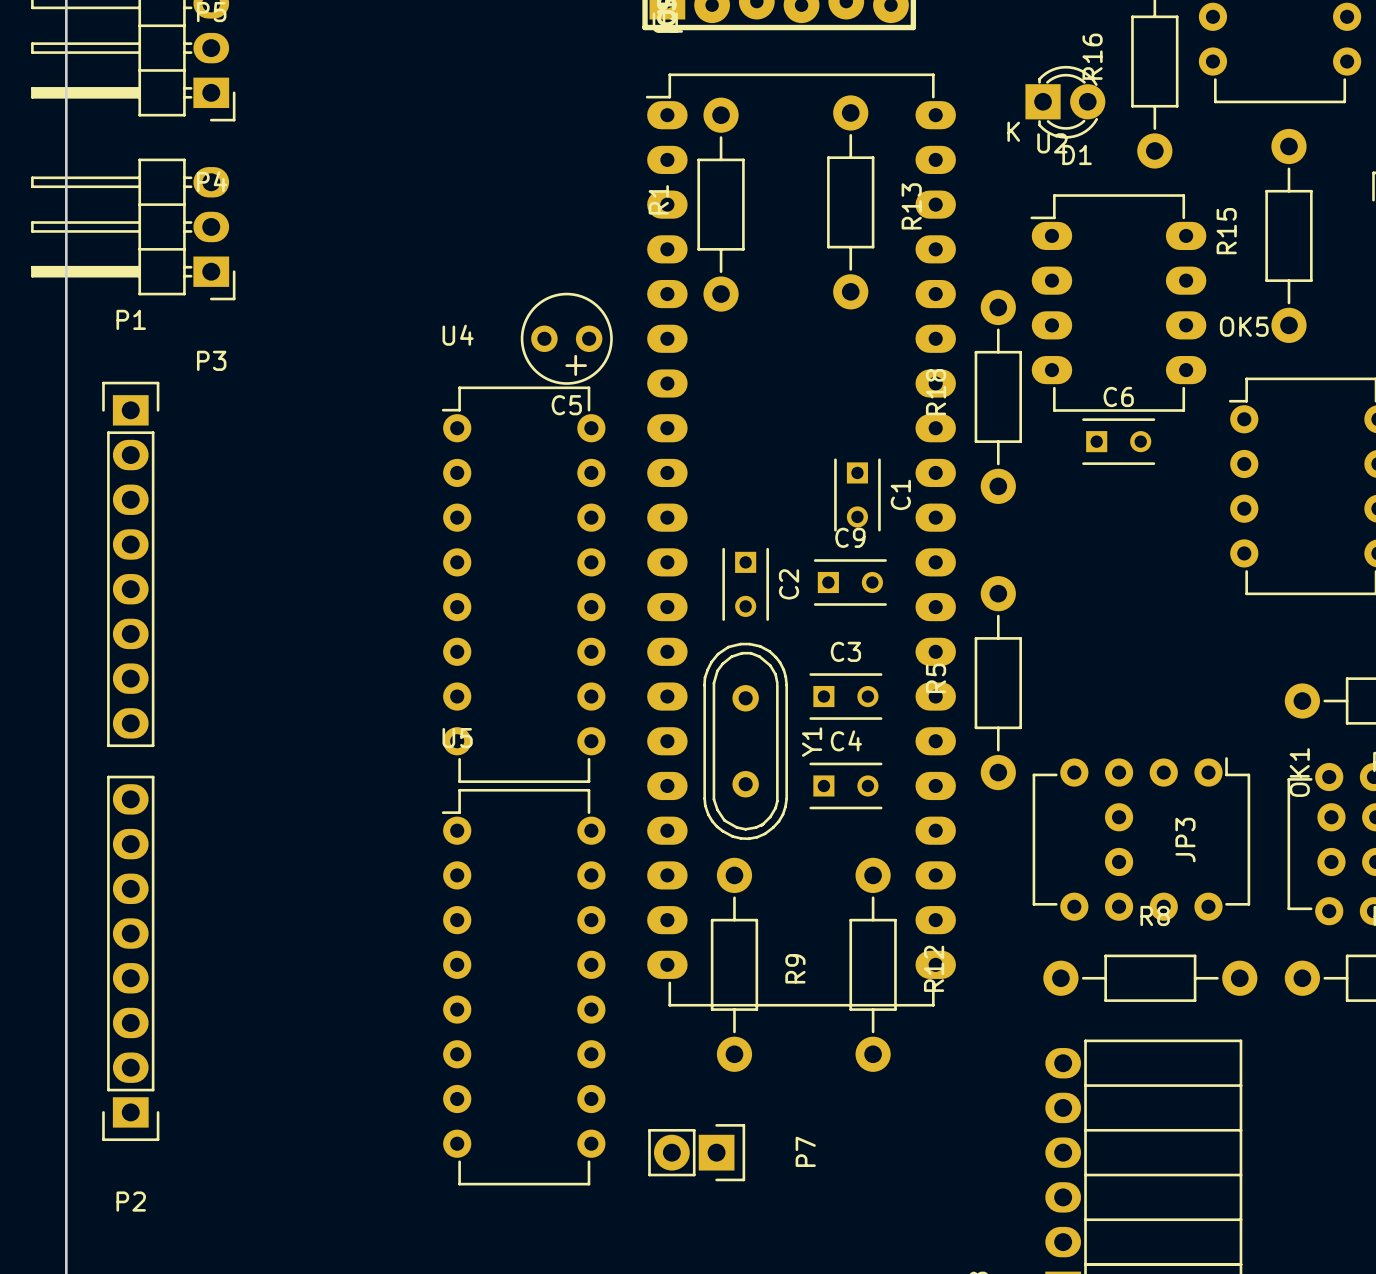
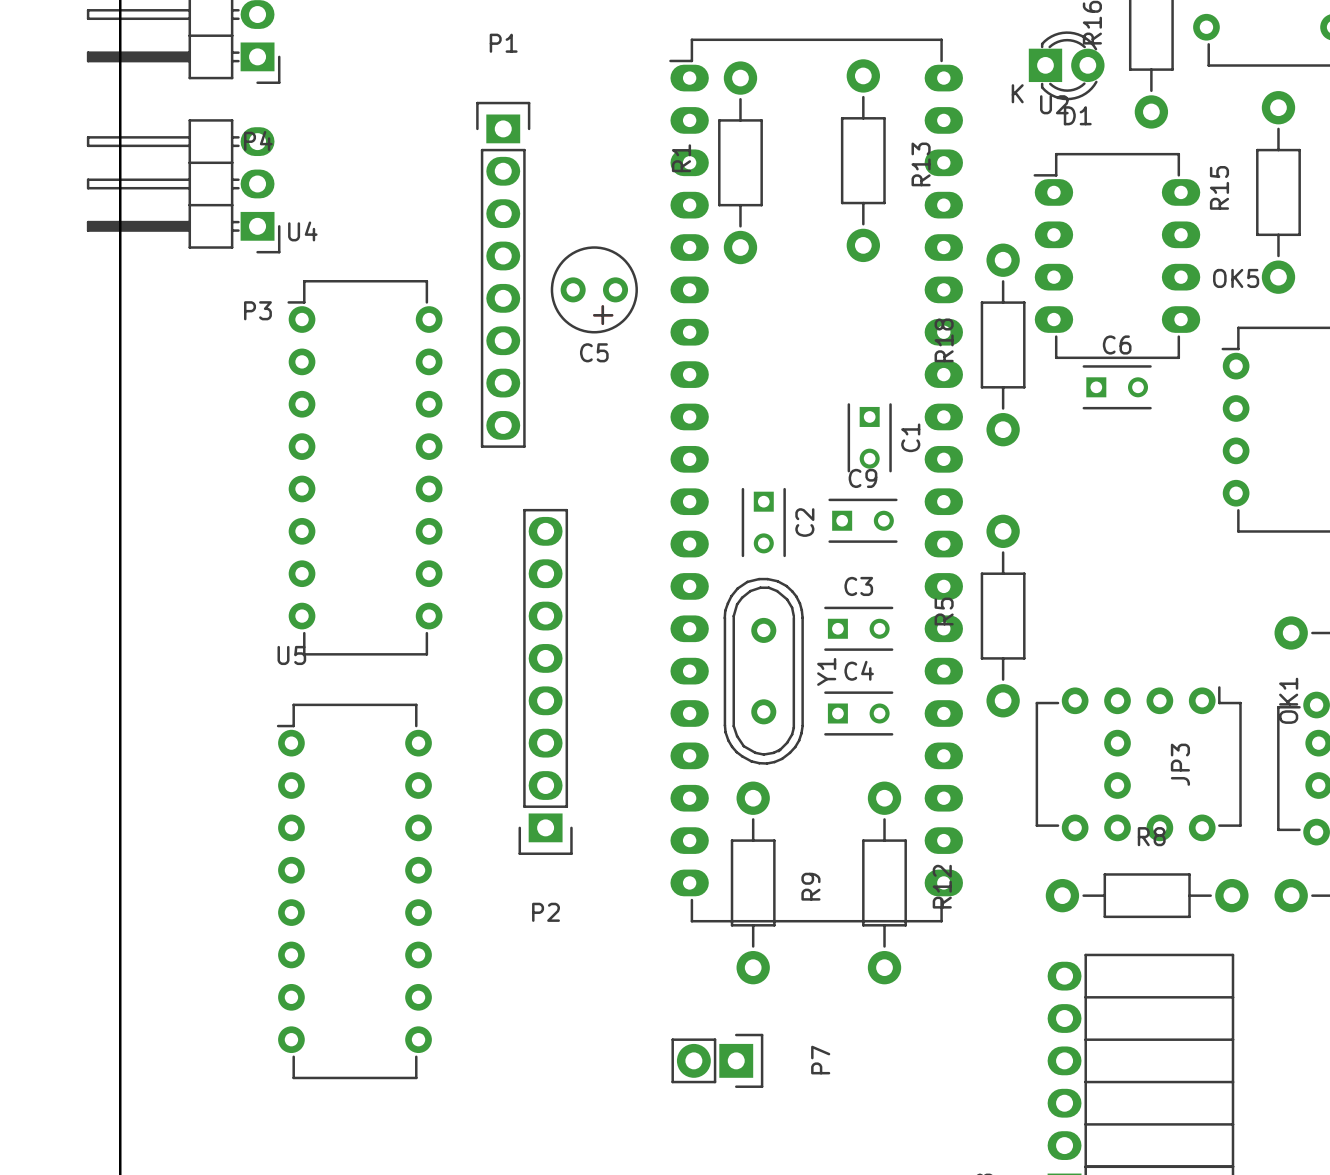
P1 position: (130, 564) -> (503, 274)
U4 position: (523, 584) -> (364, 467)
P2 position: (130, 958) -> (545, 681)
U5 position: (523, 987) -> (354, 891)

